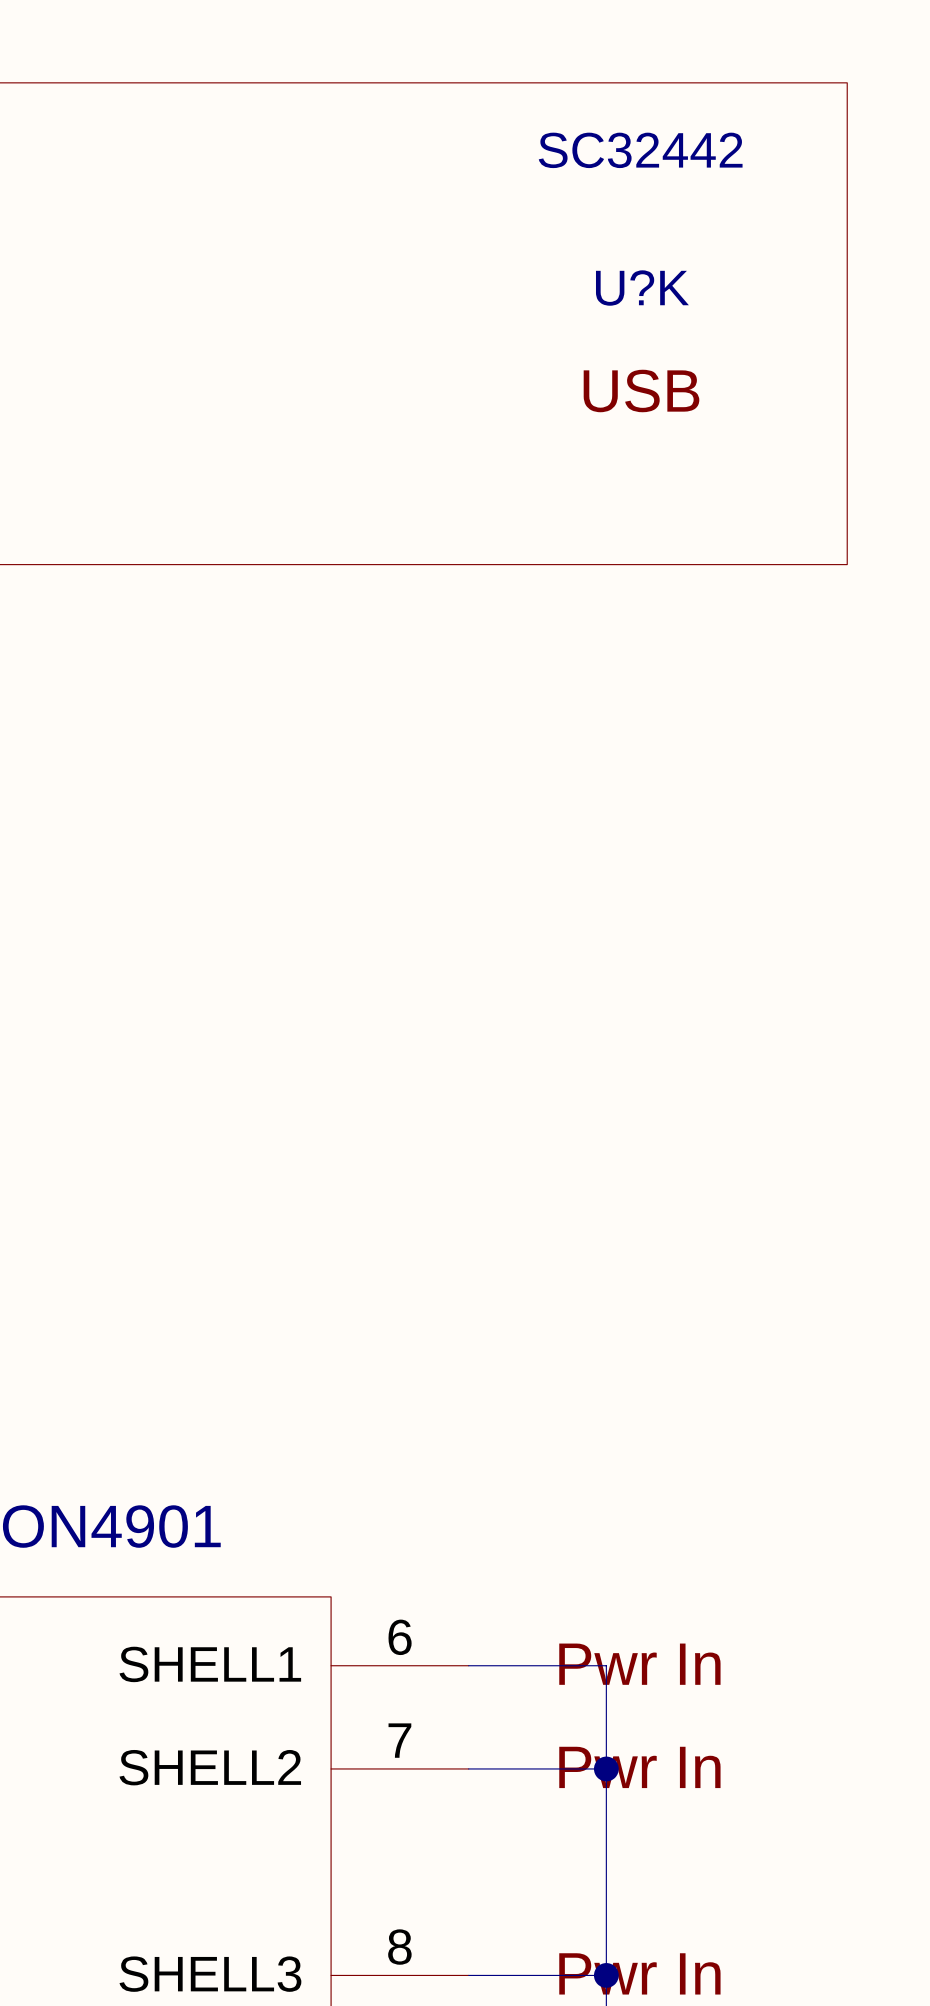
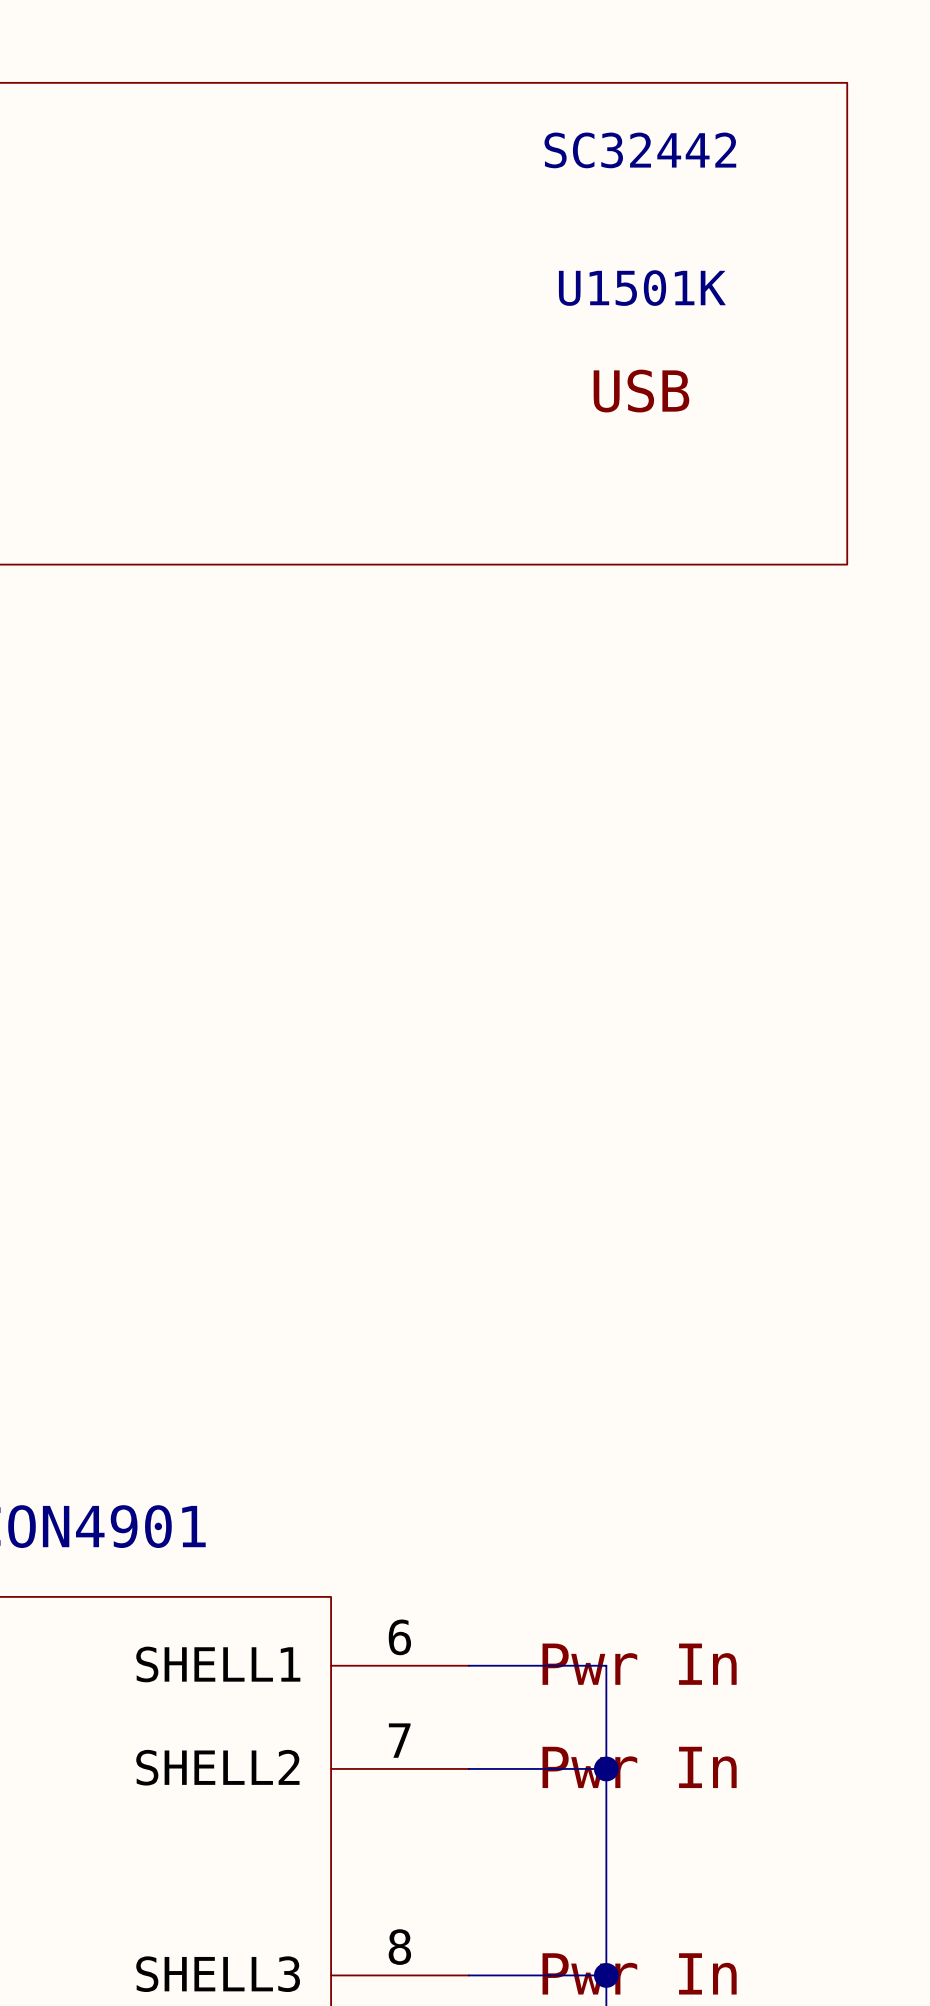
U?K name: U?K (642, 288) -> U1501K (642, 288)

